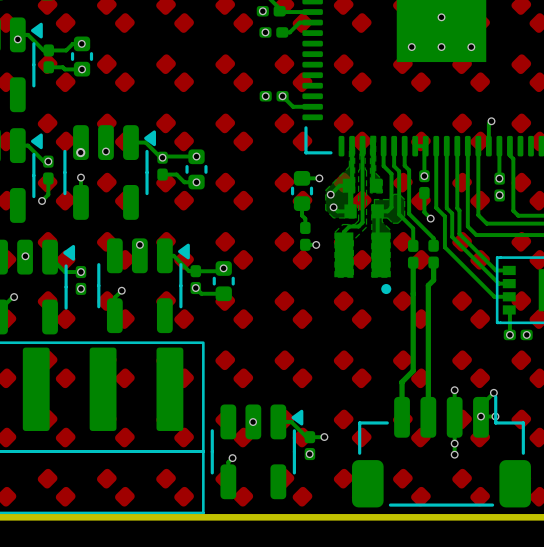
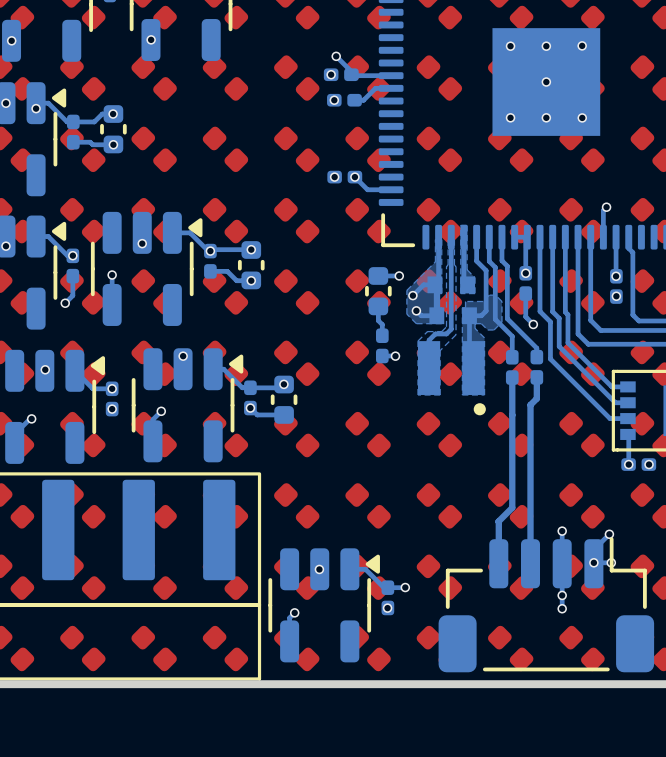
via: (80, 152) -> none

